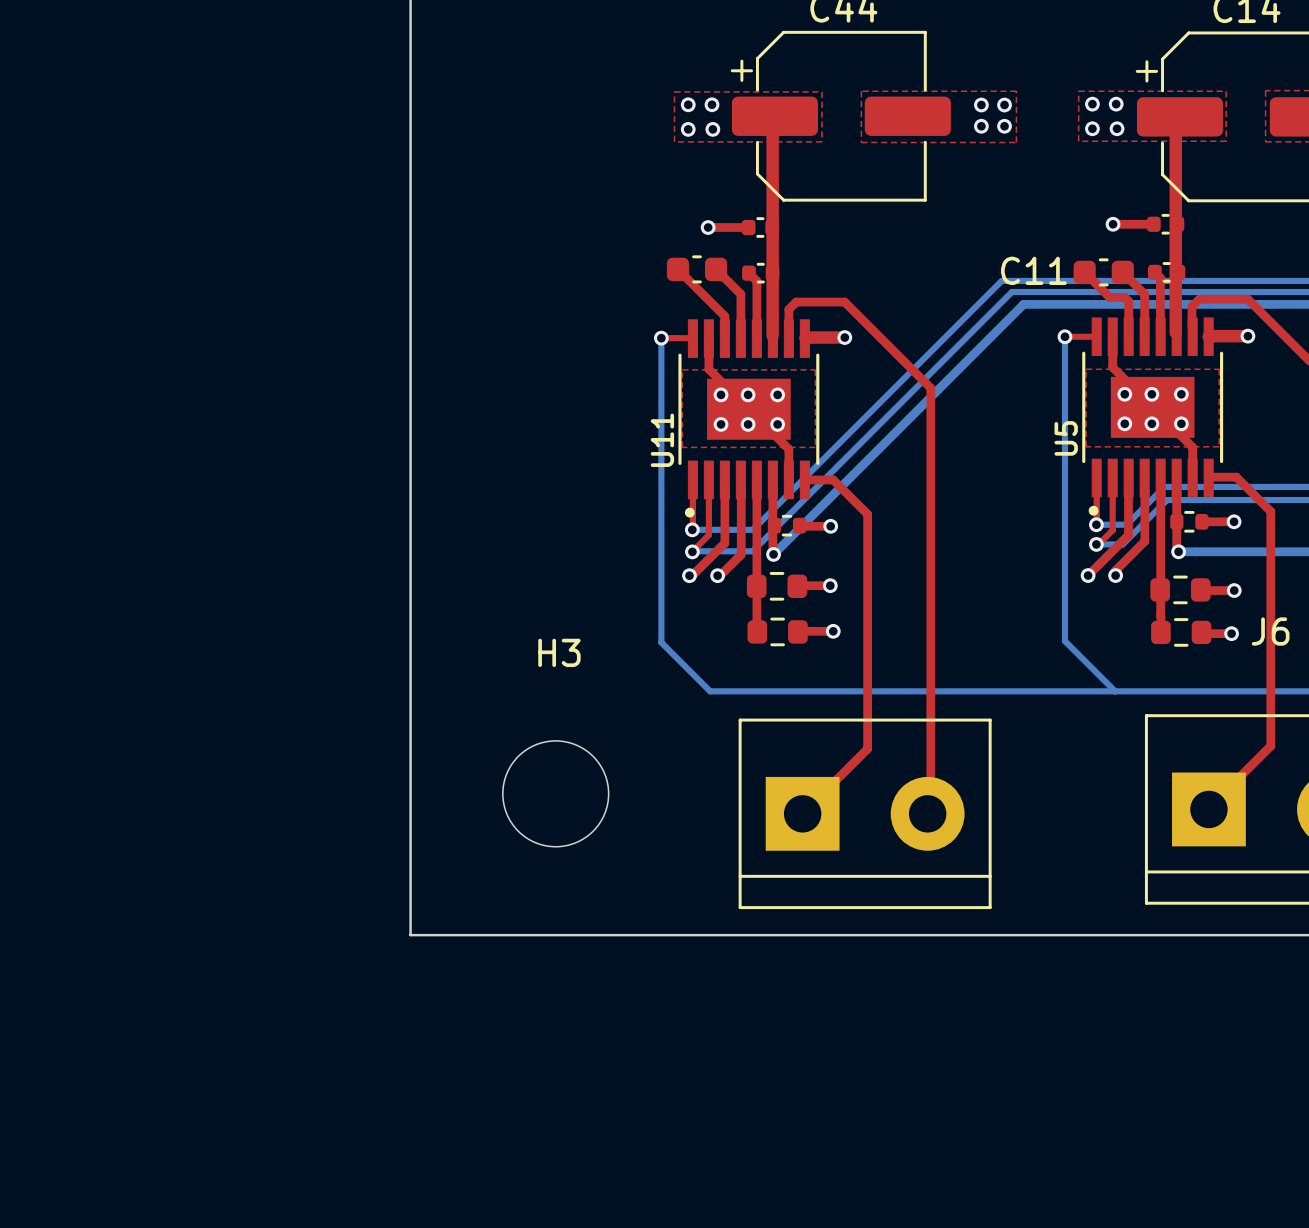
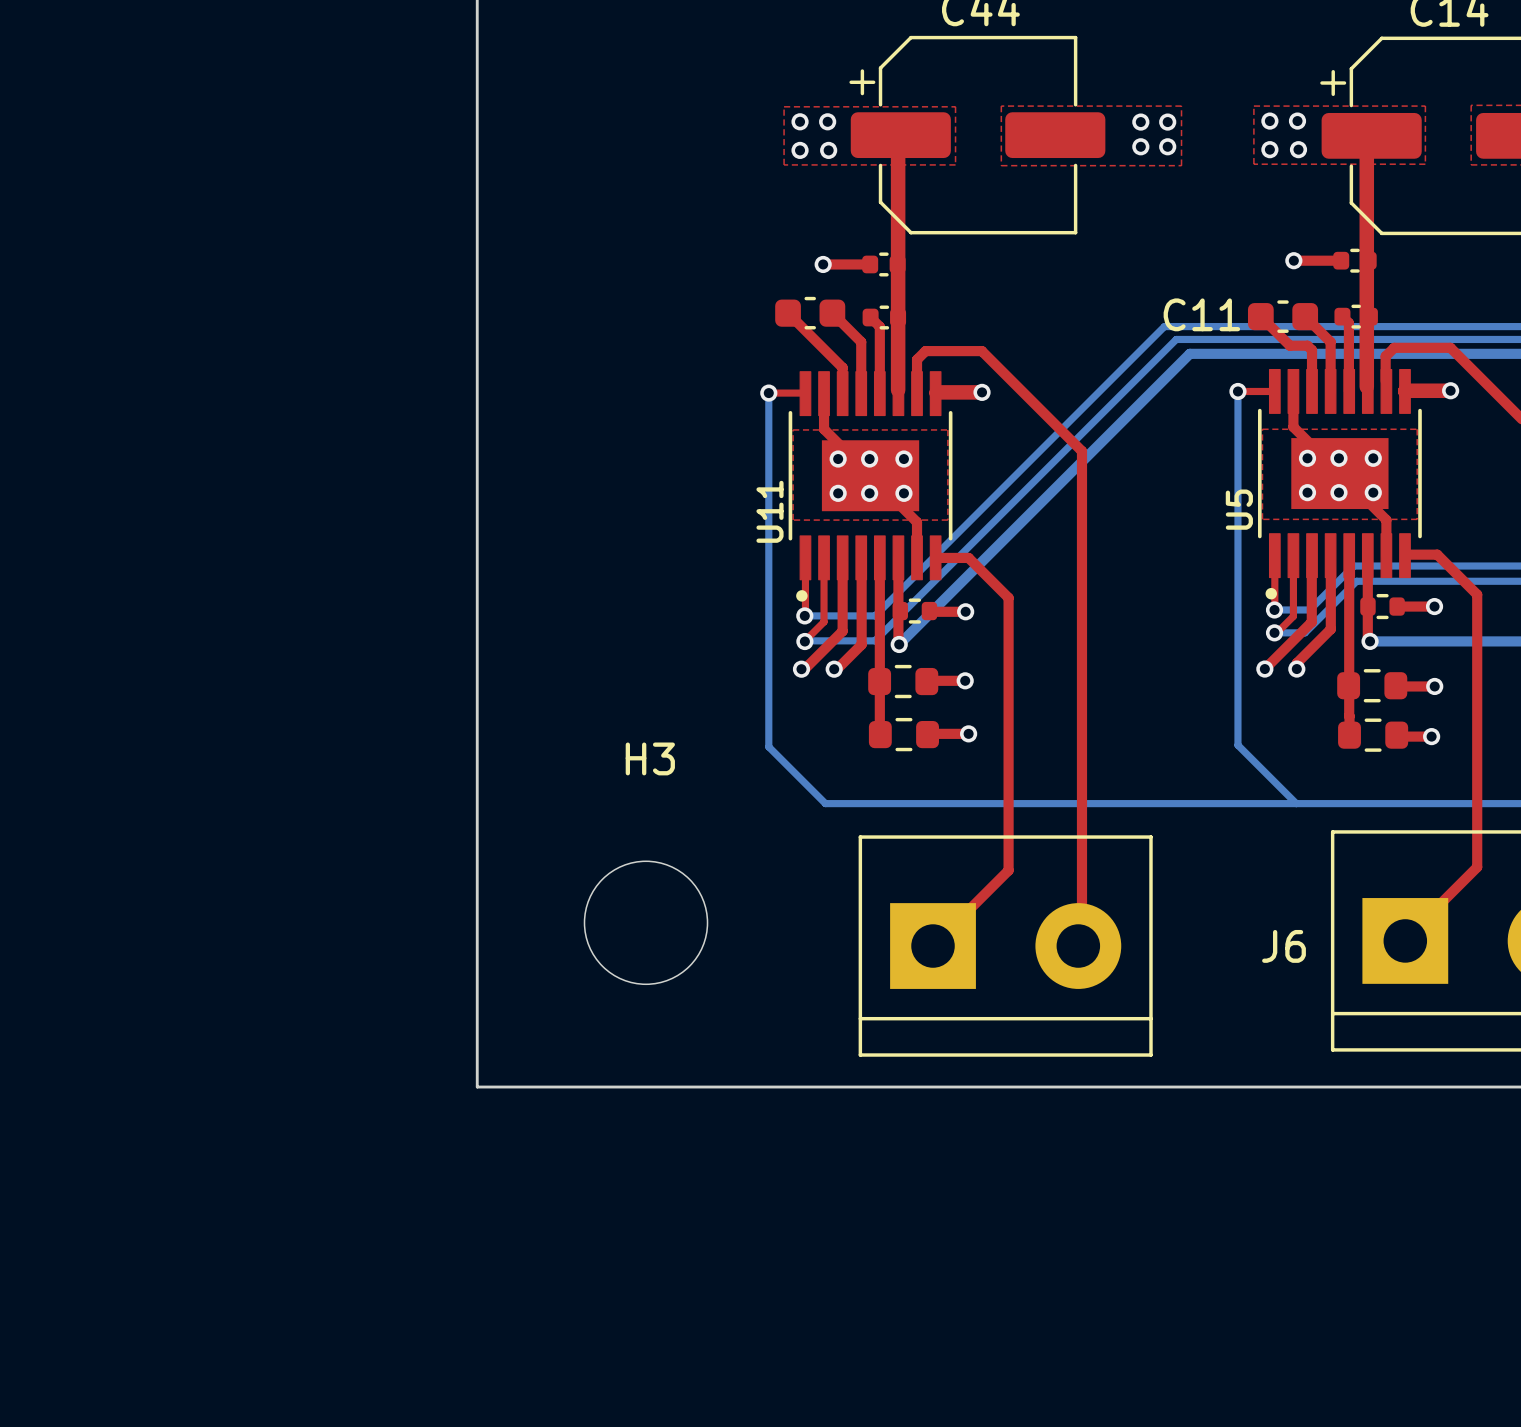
J6 name position: J6 (1270, 631) -> J6 (1284, 946)

